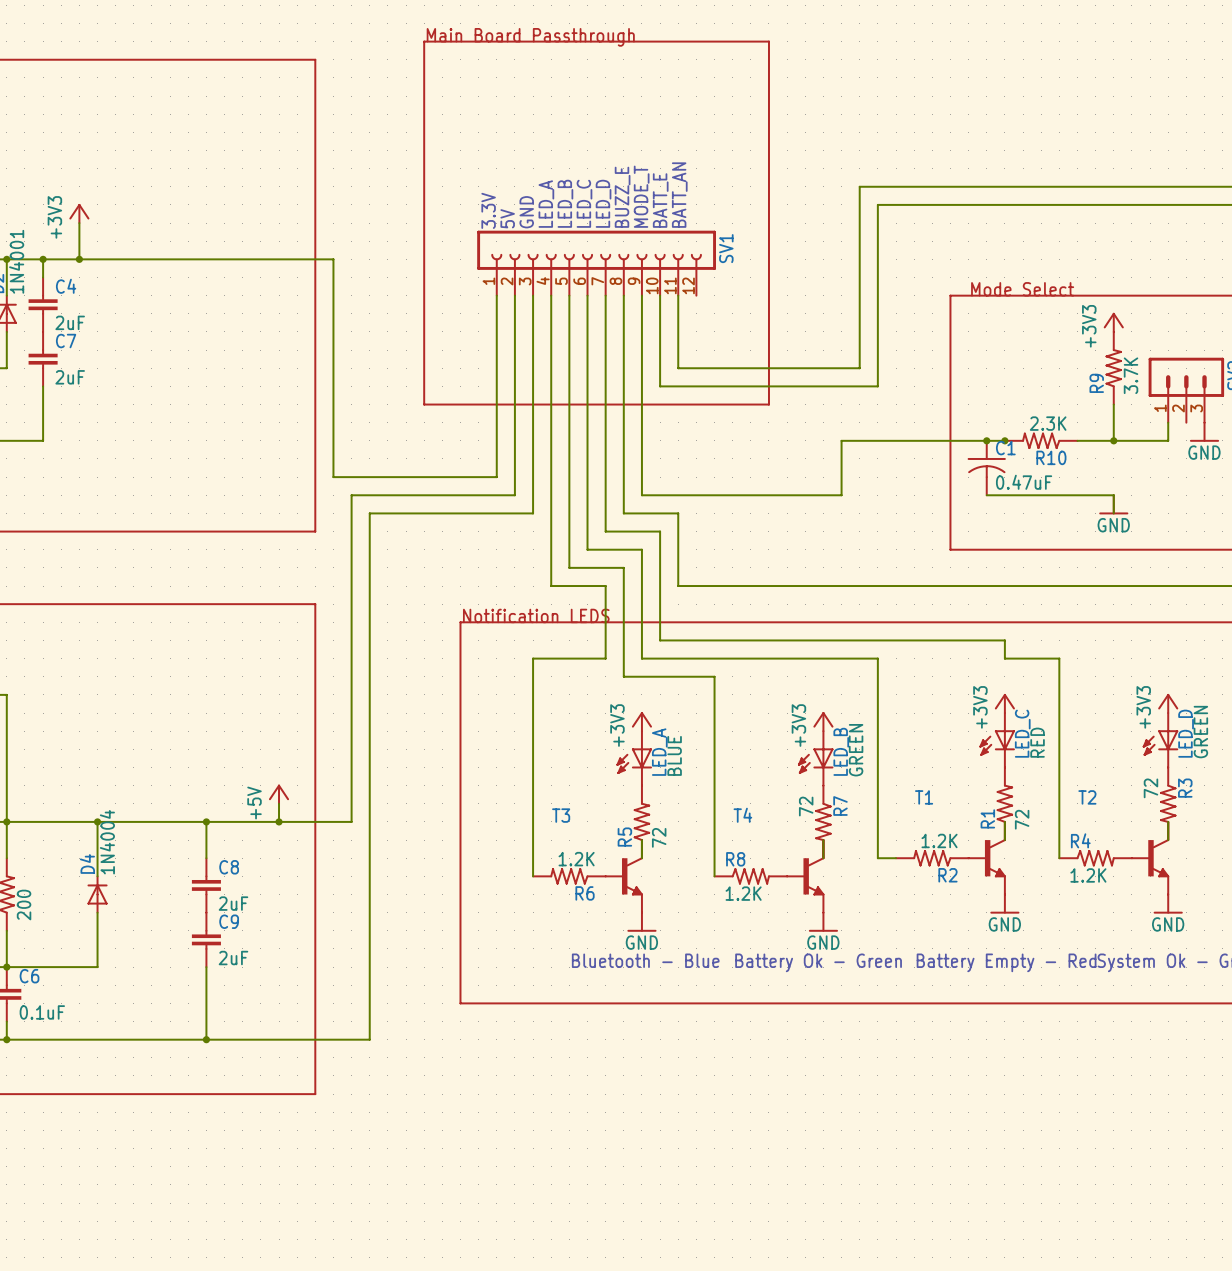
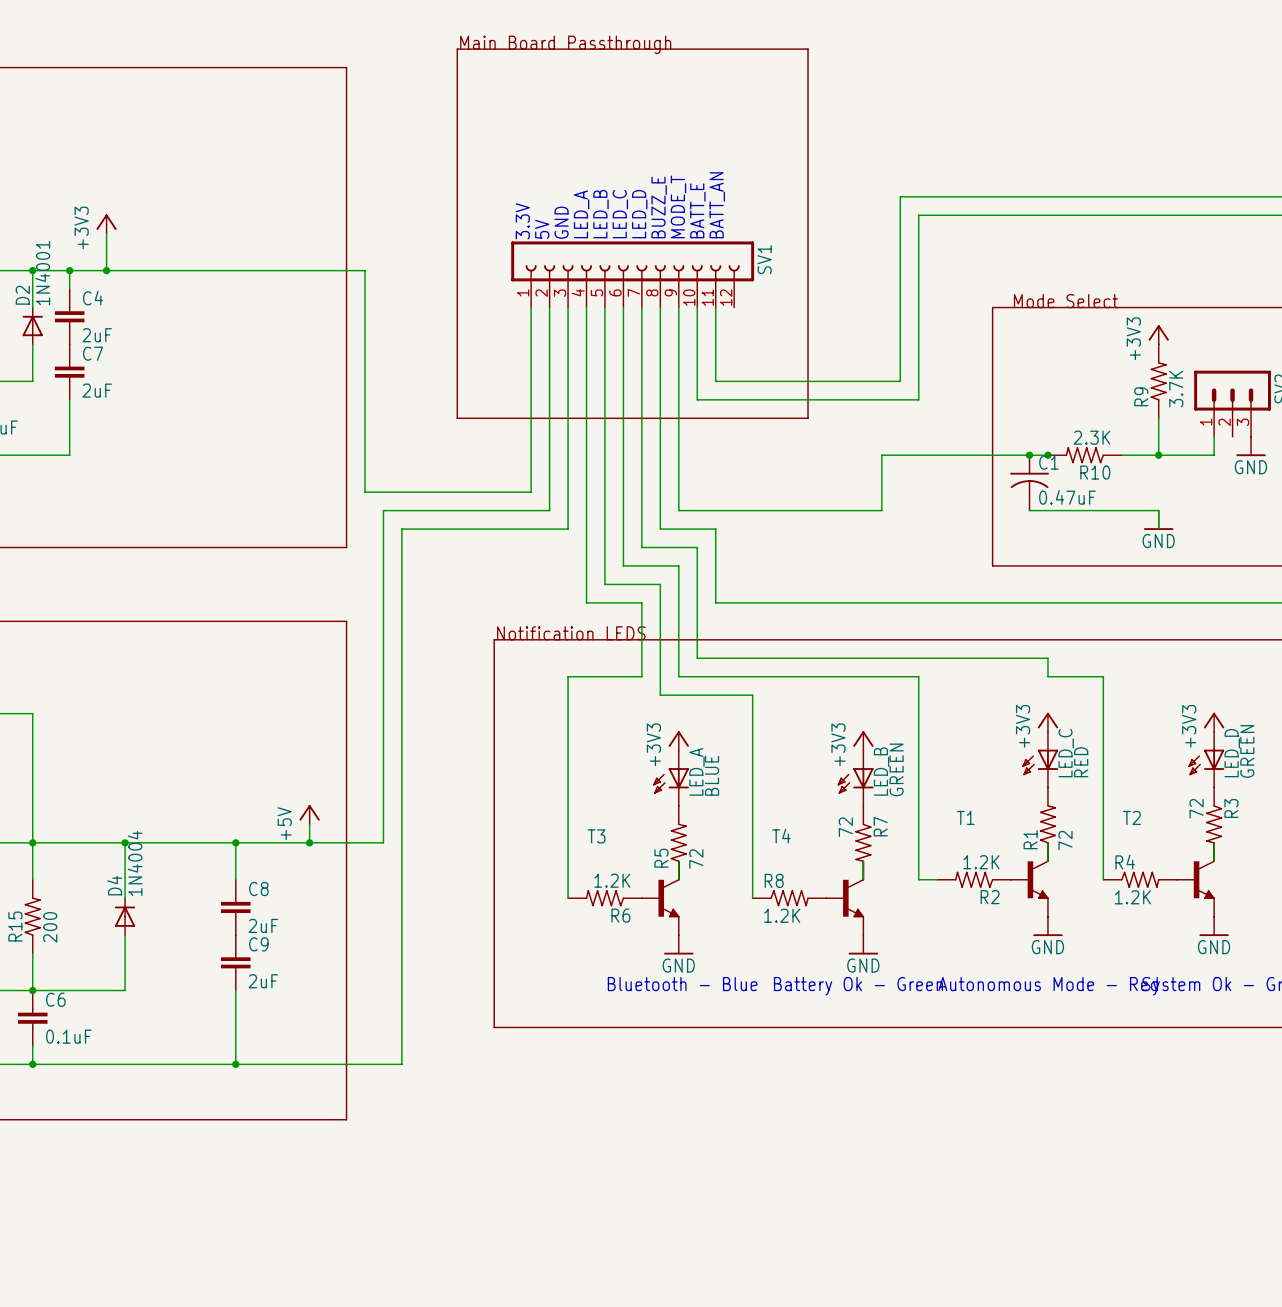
text: none -> Autonomous Mode - Red (1048, 984)
text: Battery Empty - Red (1006, 962) -> none

